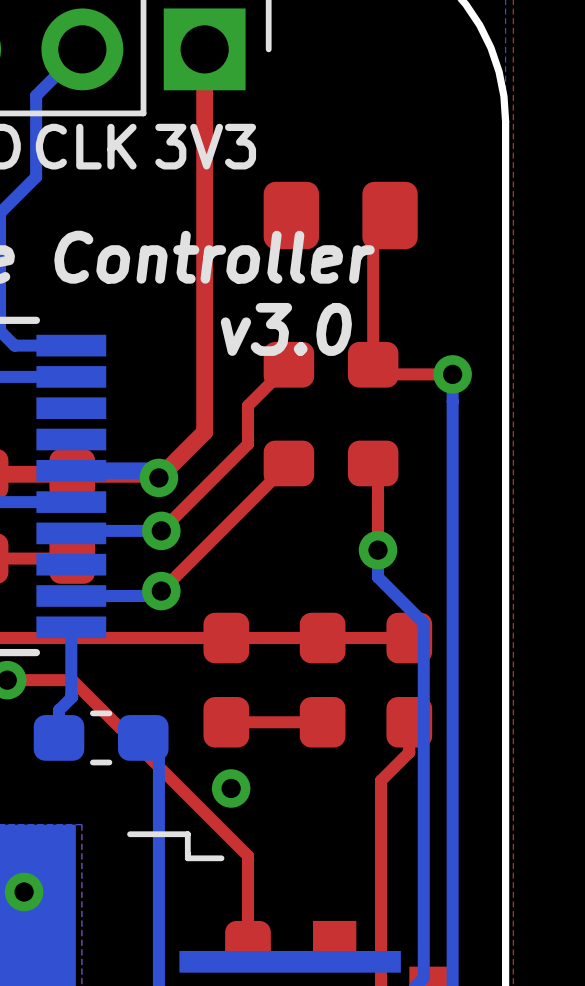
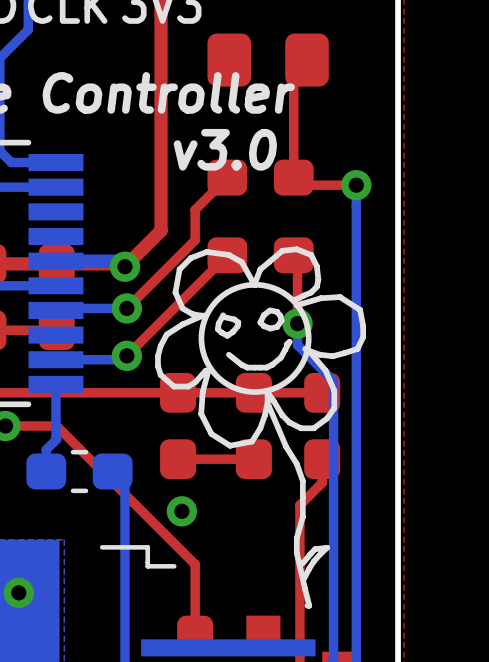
drawing: none -> [155, 246, 366, 609]

